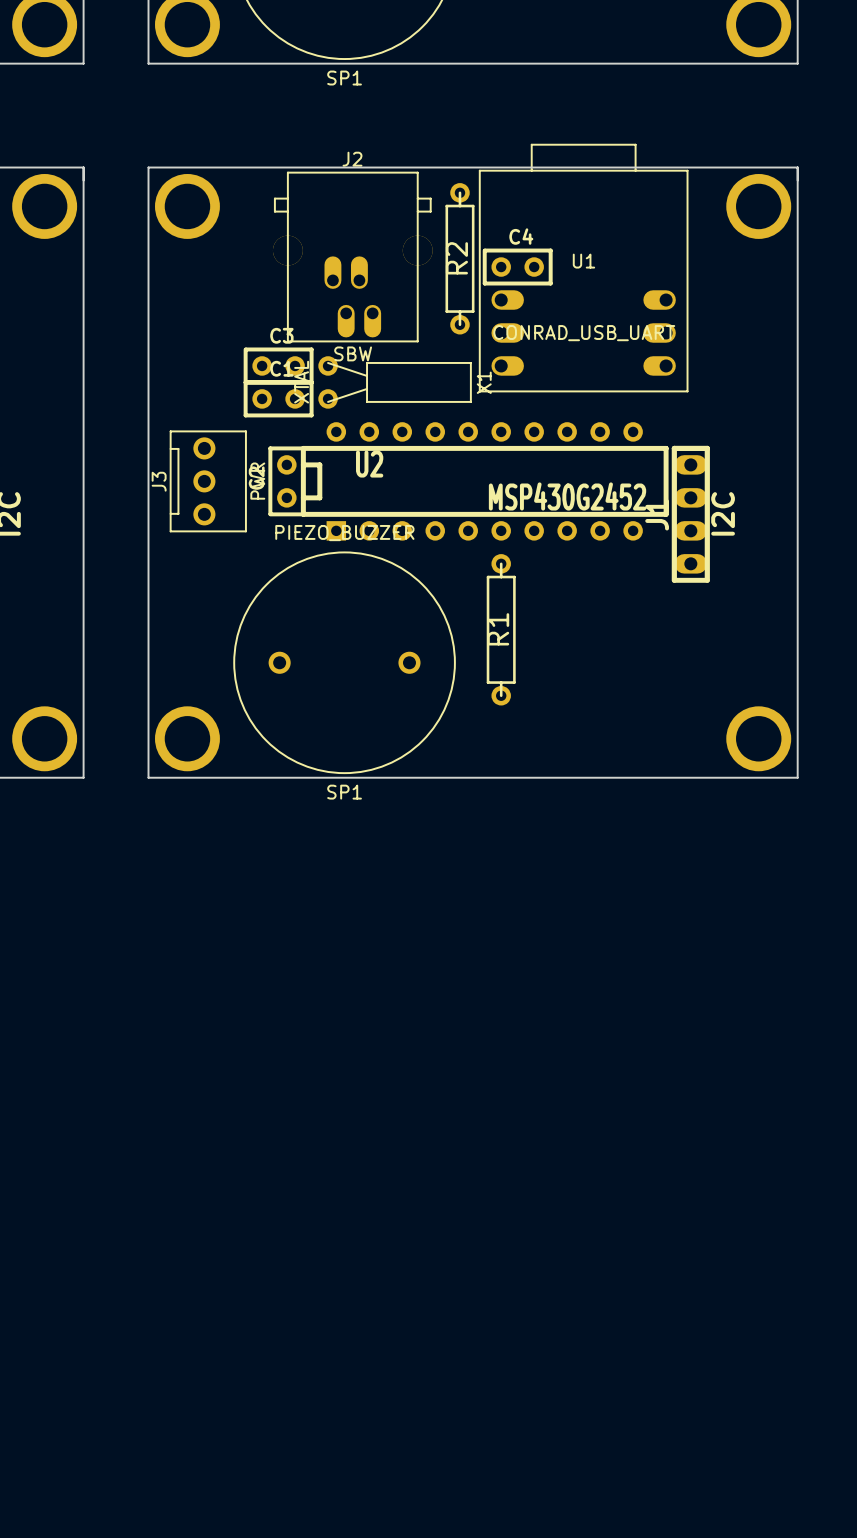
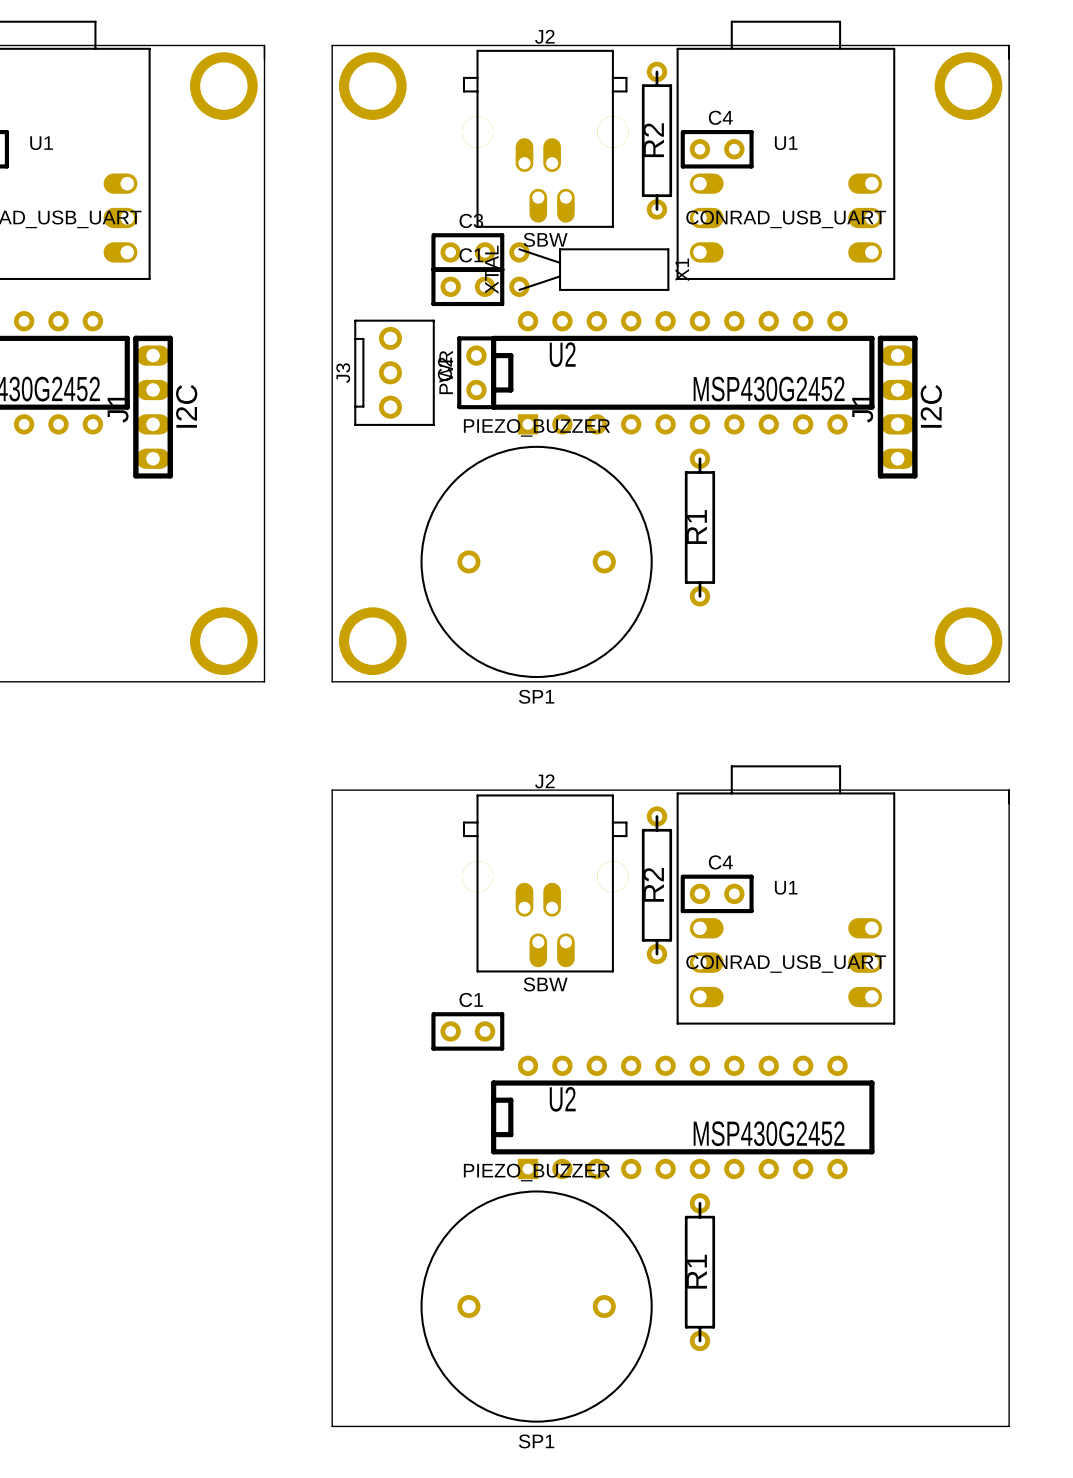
board edge: none -> (332, 790) (1009, 790) (1009, 1426) (332, 1426) (332, 790)
J2: none -> SBW (545, 883)
R2: none -> (656, 885)
C4: none -> (717, 893)
U1: none -> CONRAD_USB_UART (785, 894)
C1: none -> (467, 1031)
U2: none -> MSP430G2452 (682, 1117)
R1: none -> (699, 1272)
SP1: none -> PIEZO_BUZZER (536, 1306)

